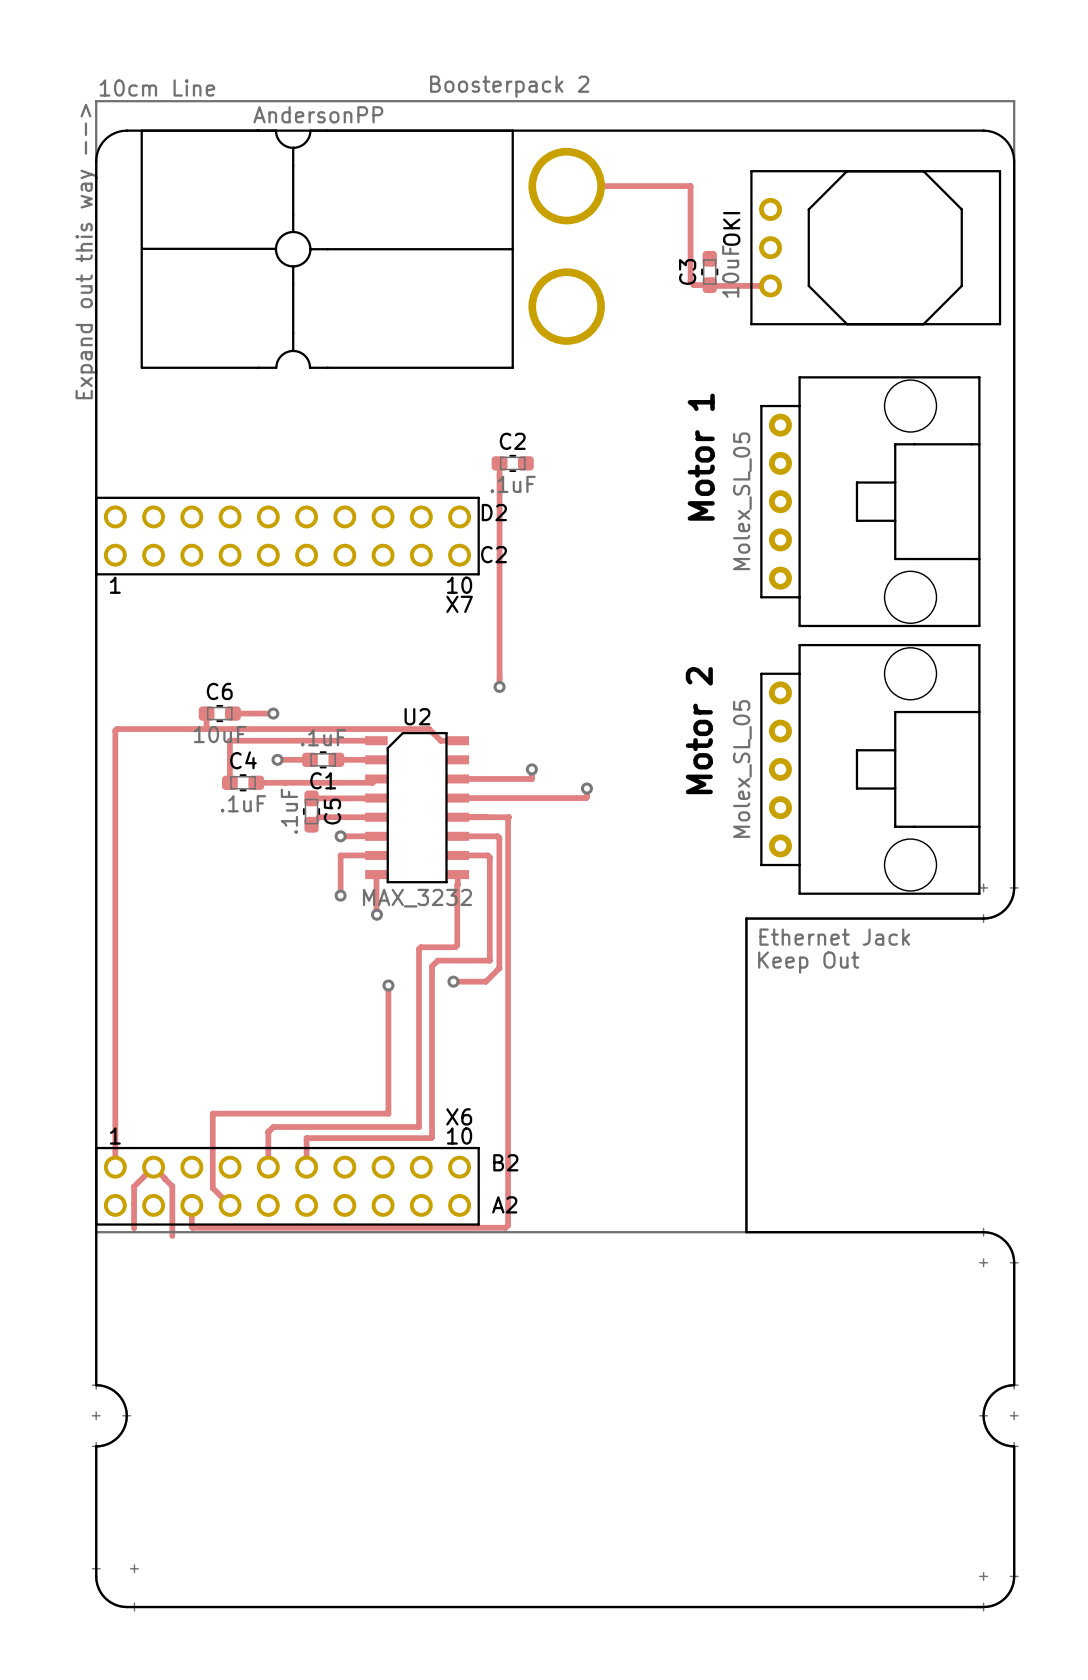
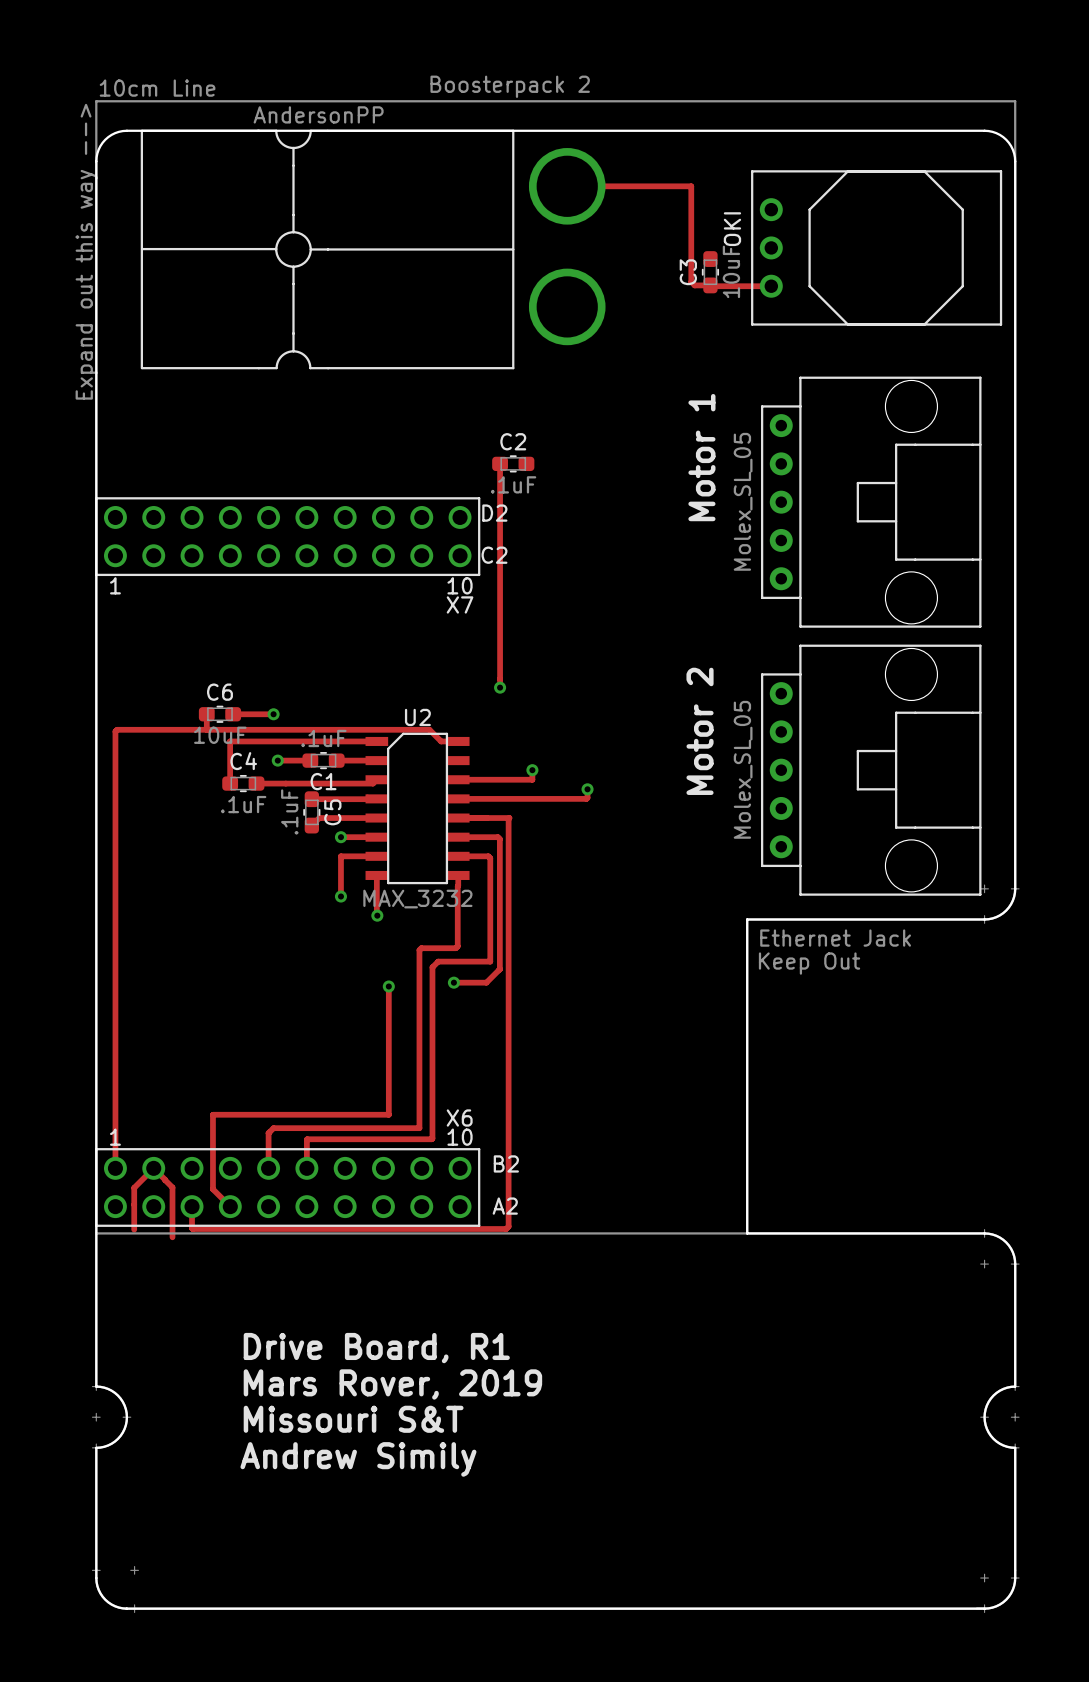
text: none -> Drive Board, R1 (376, 1348)
text: none -> Mars Rover, 2019 (392, 1384)
text: none -> Missouri S&T (353, 1419)
text: none -> Andrew Simily (358, 1459)

